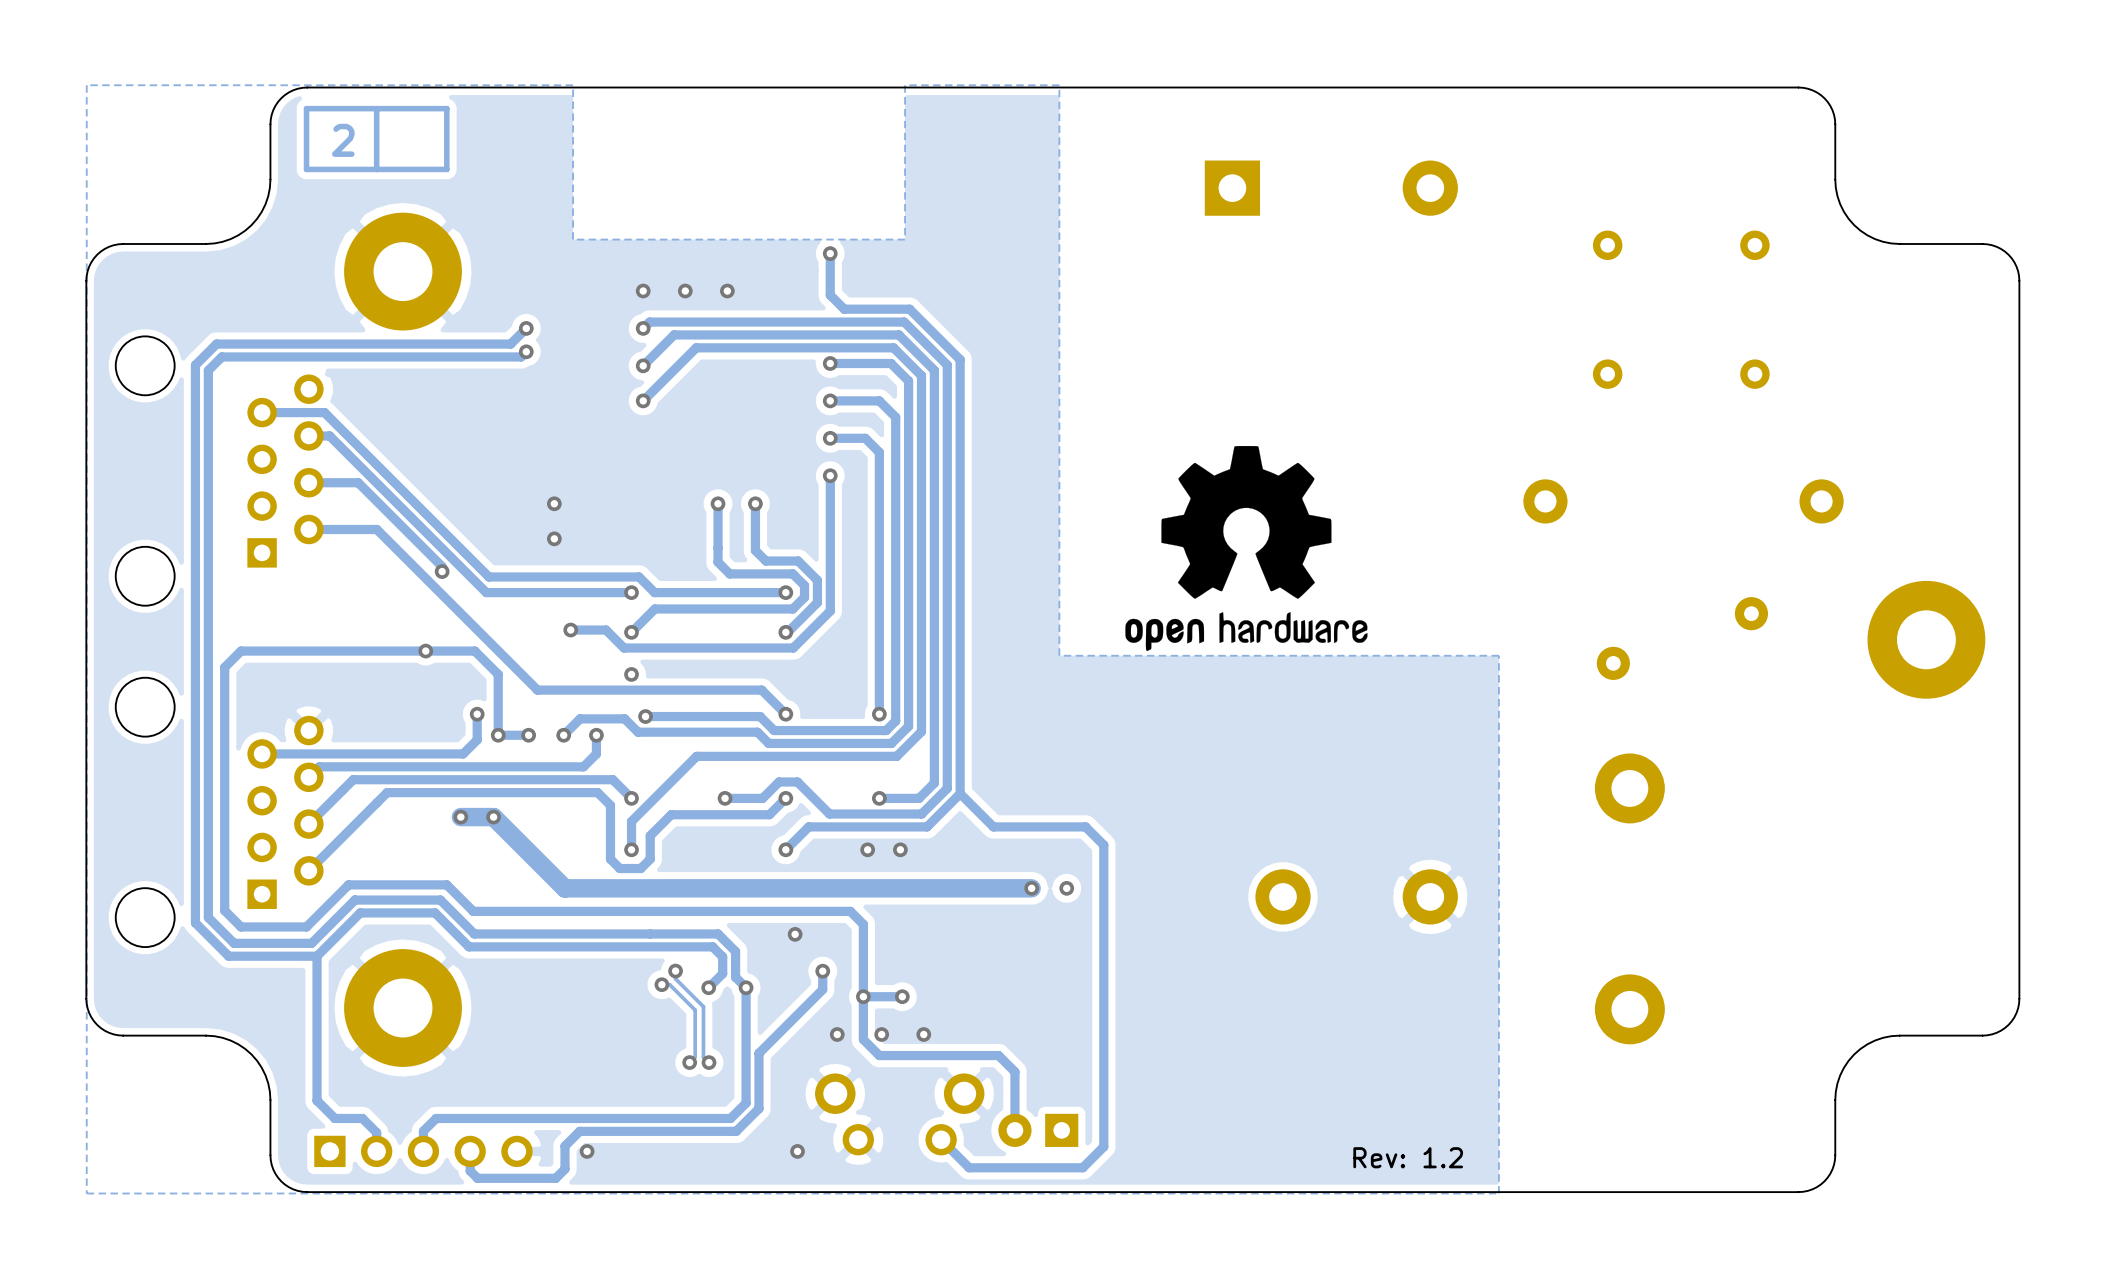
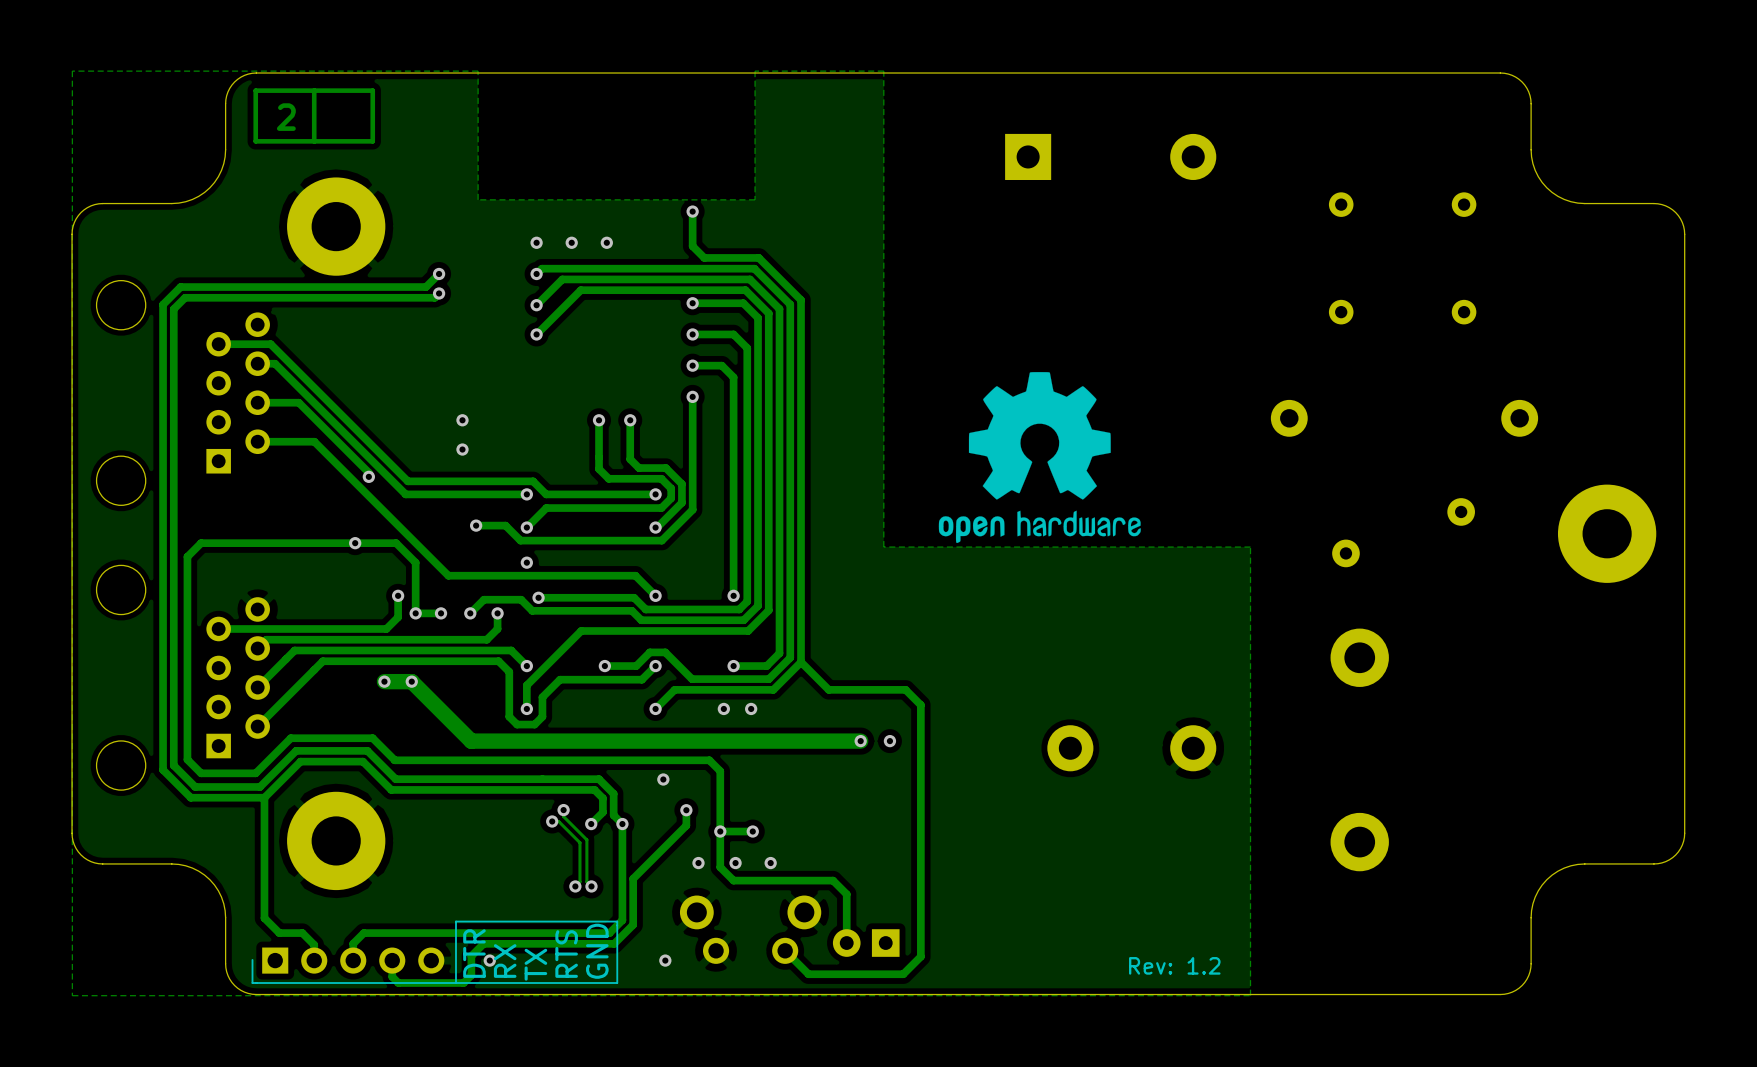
text: none -> GND (597, 951)
text: none -> DTR (474, 953)
text: none -> RTS (566, 954)
line: none -> (252, 959) (252, 983) (617, 983) (617, 921) (456, 921) (456, 983)
text: none -> RX (505, 961)
text: none -> TX (535, 964)

